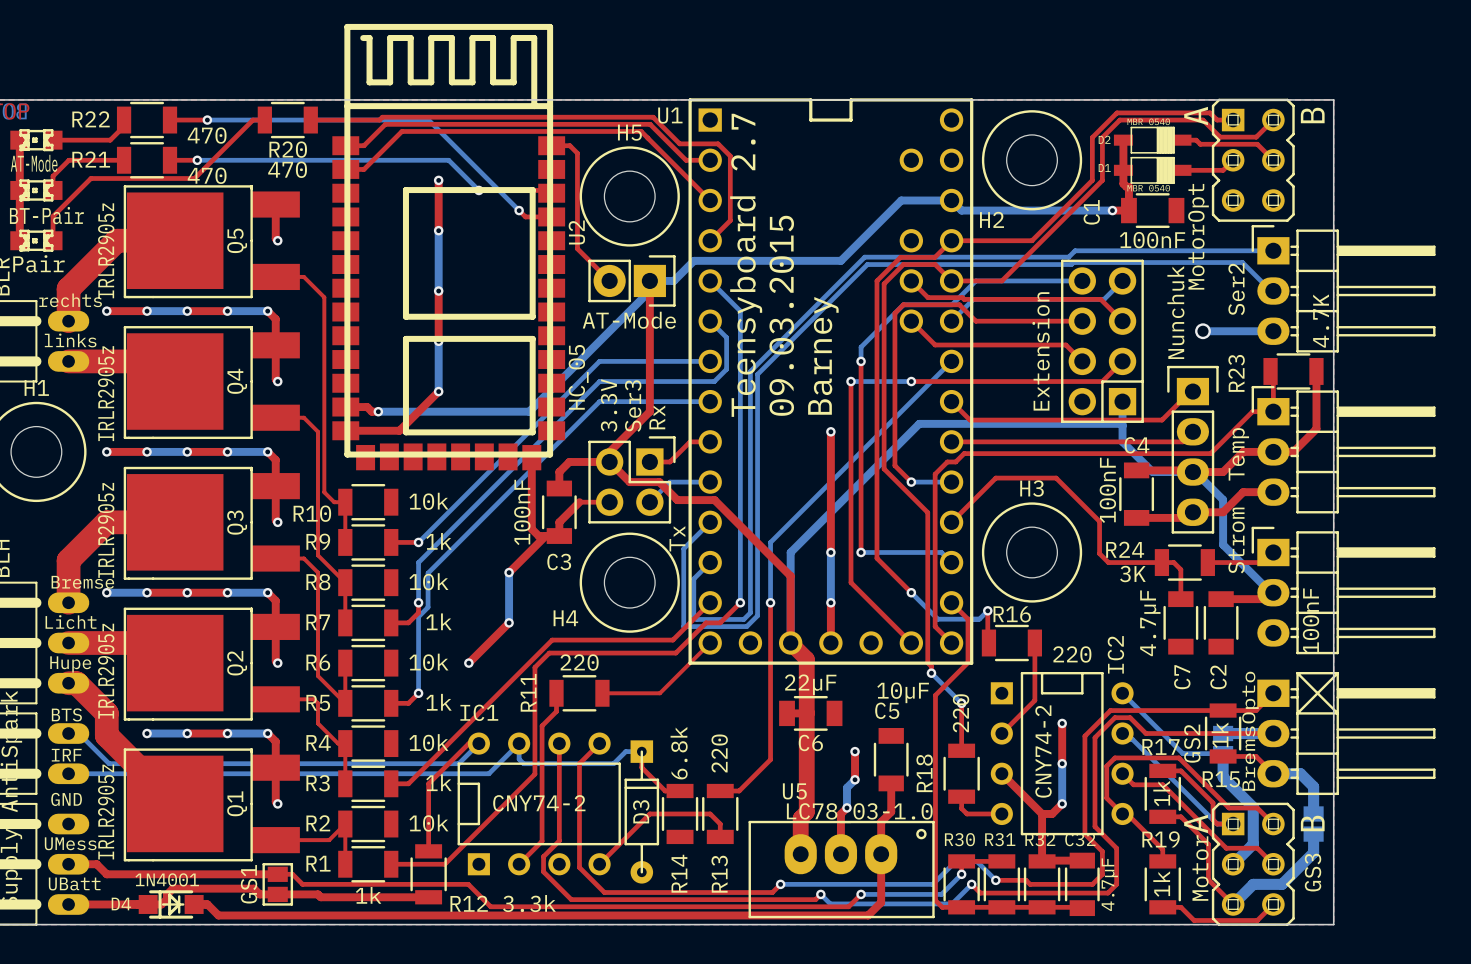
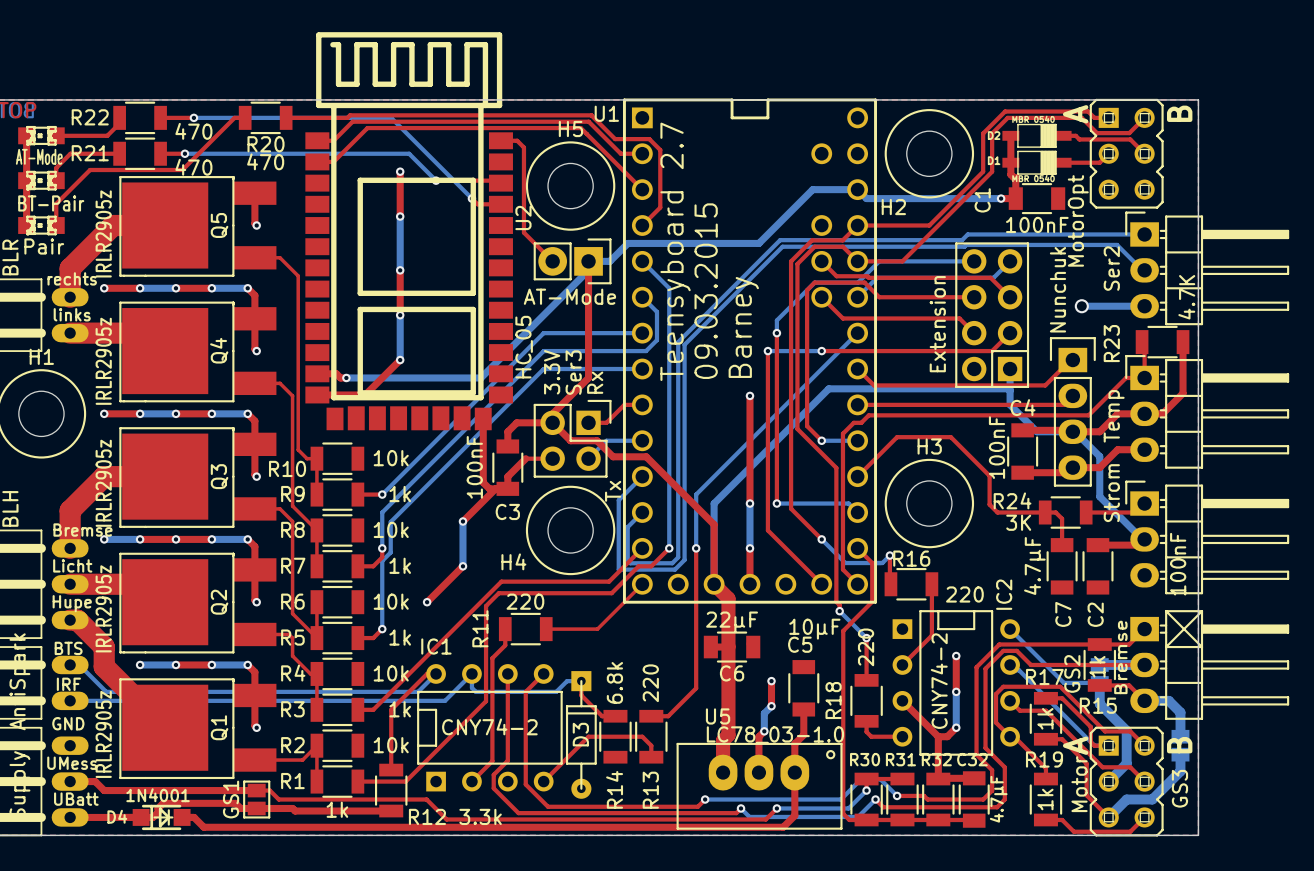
U2 footprint: [332, 23, 566, 471] -> [305, 32, 513, 431]
part value: BremsOpto (1250, 731) -> Bremse (1120, 657)

